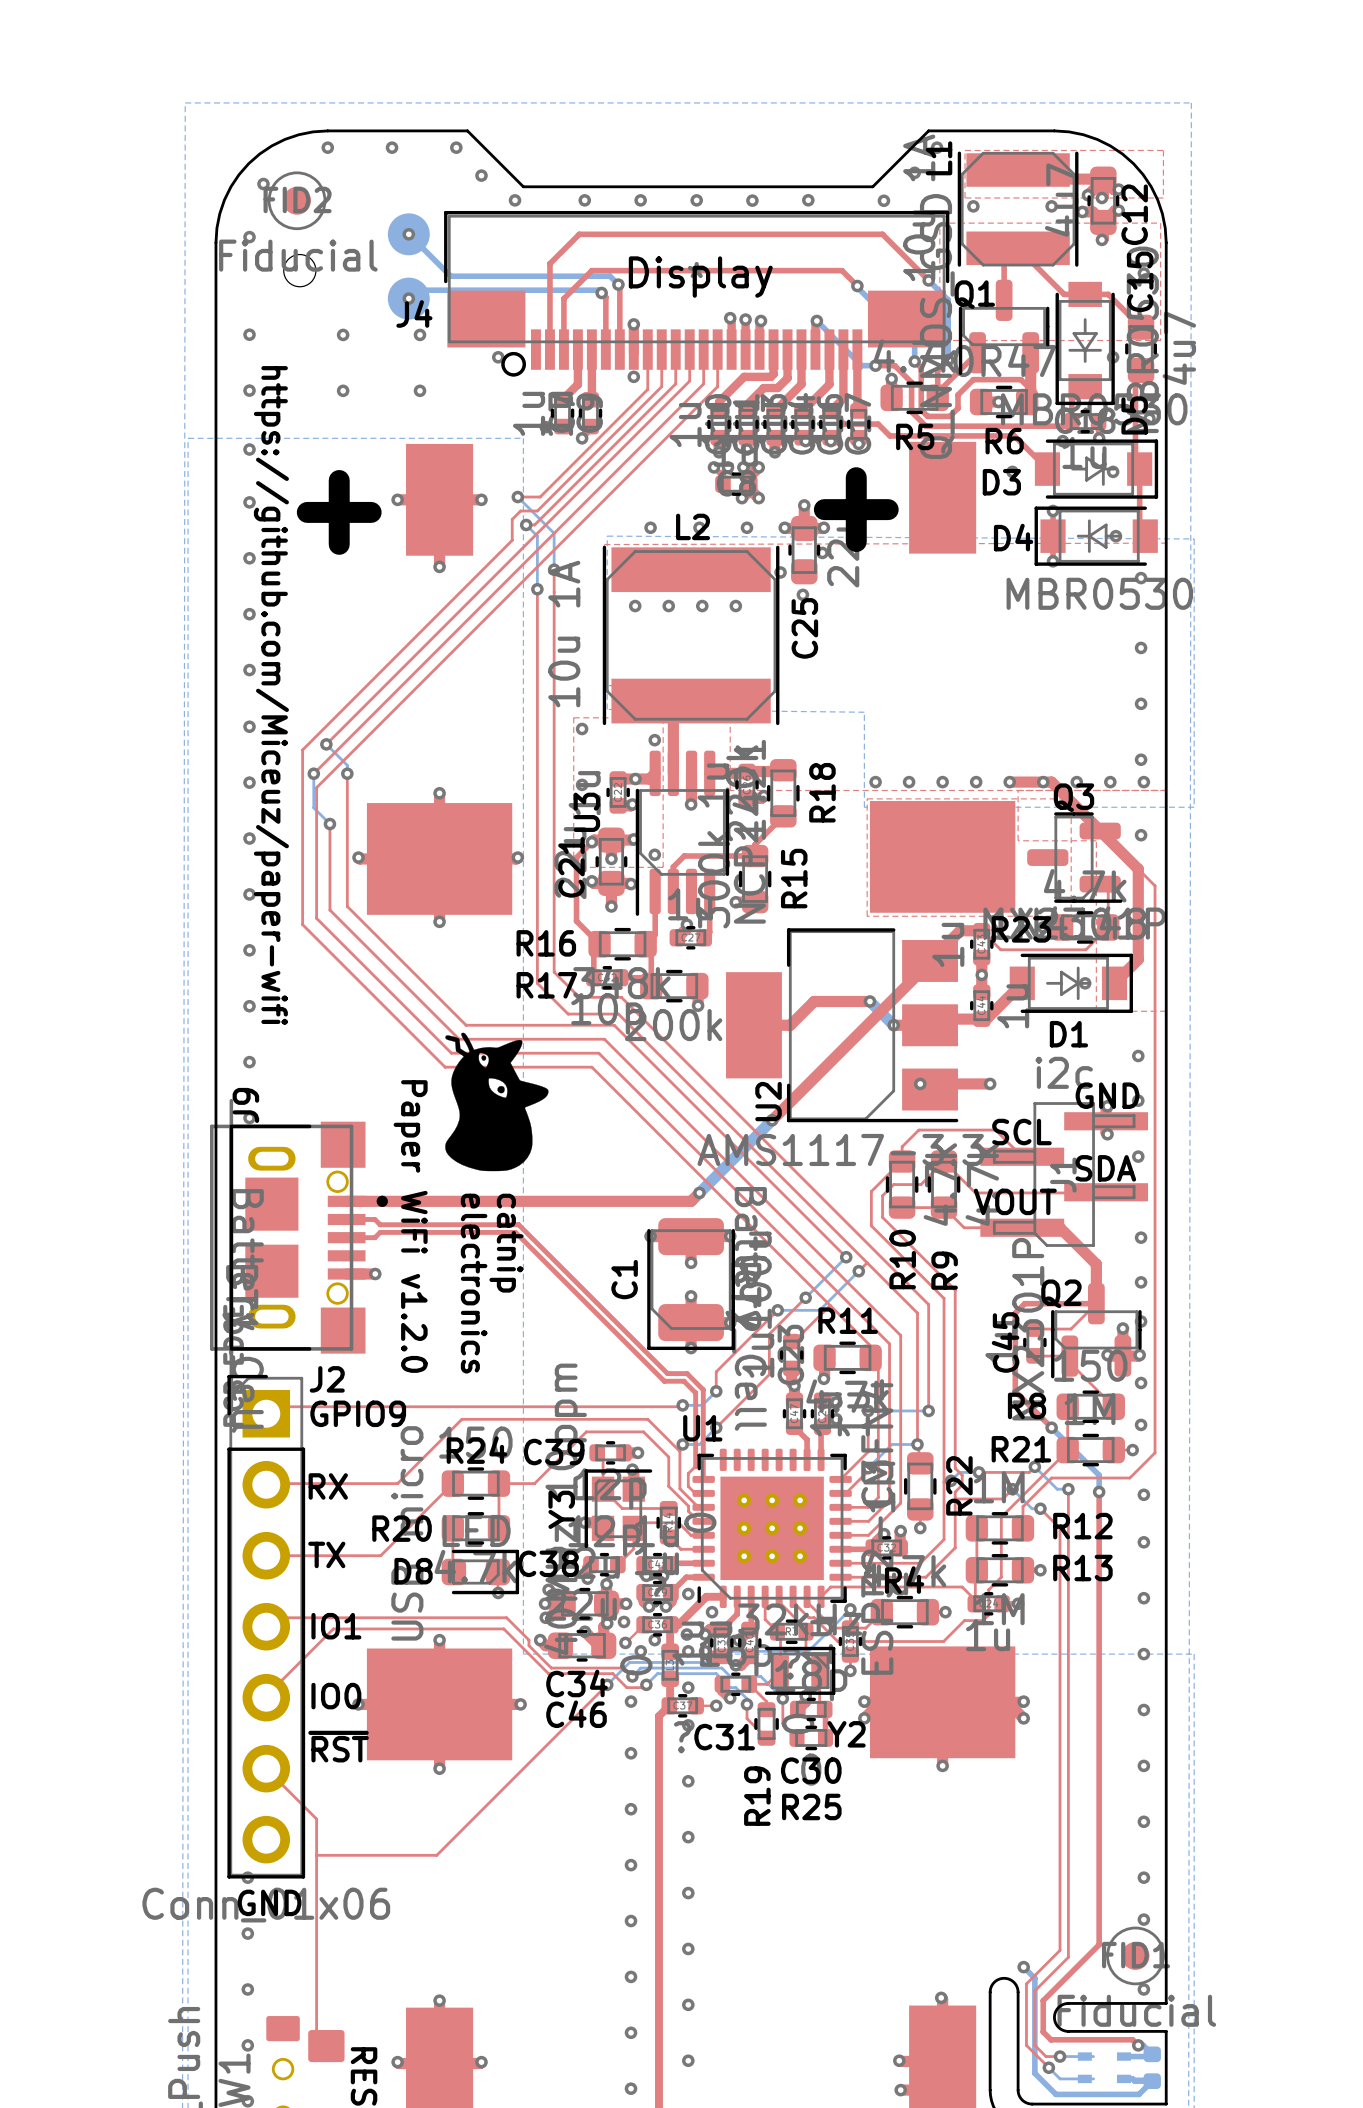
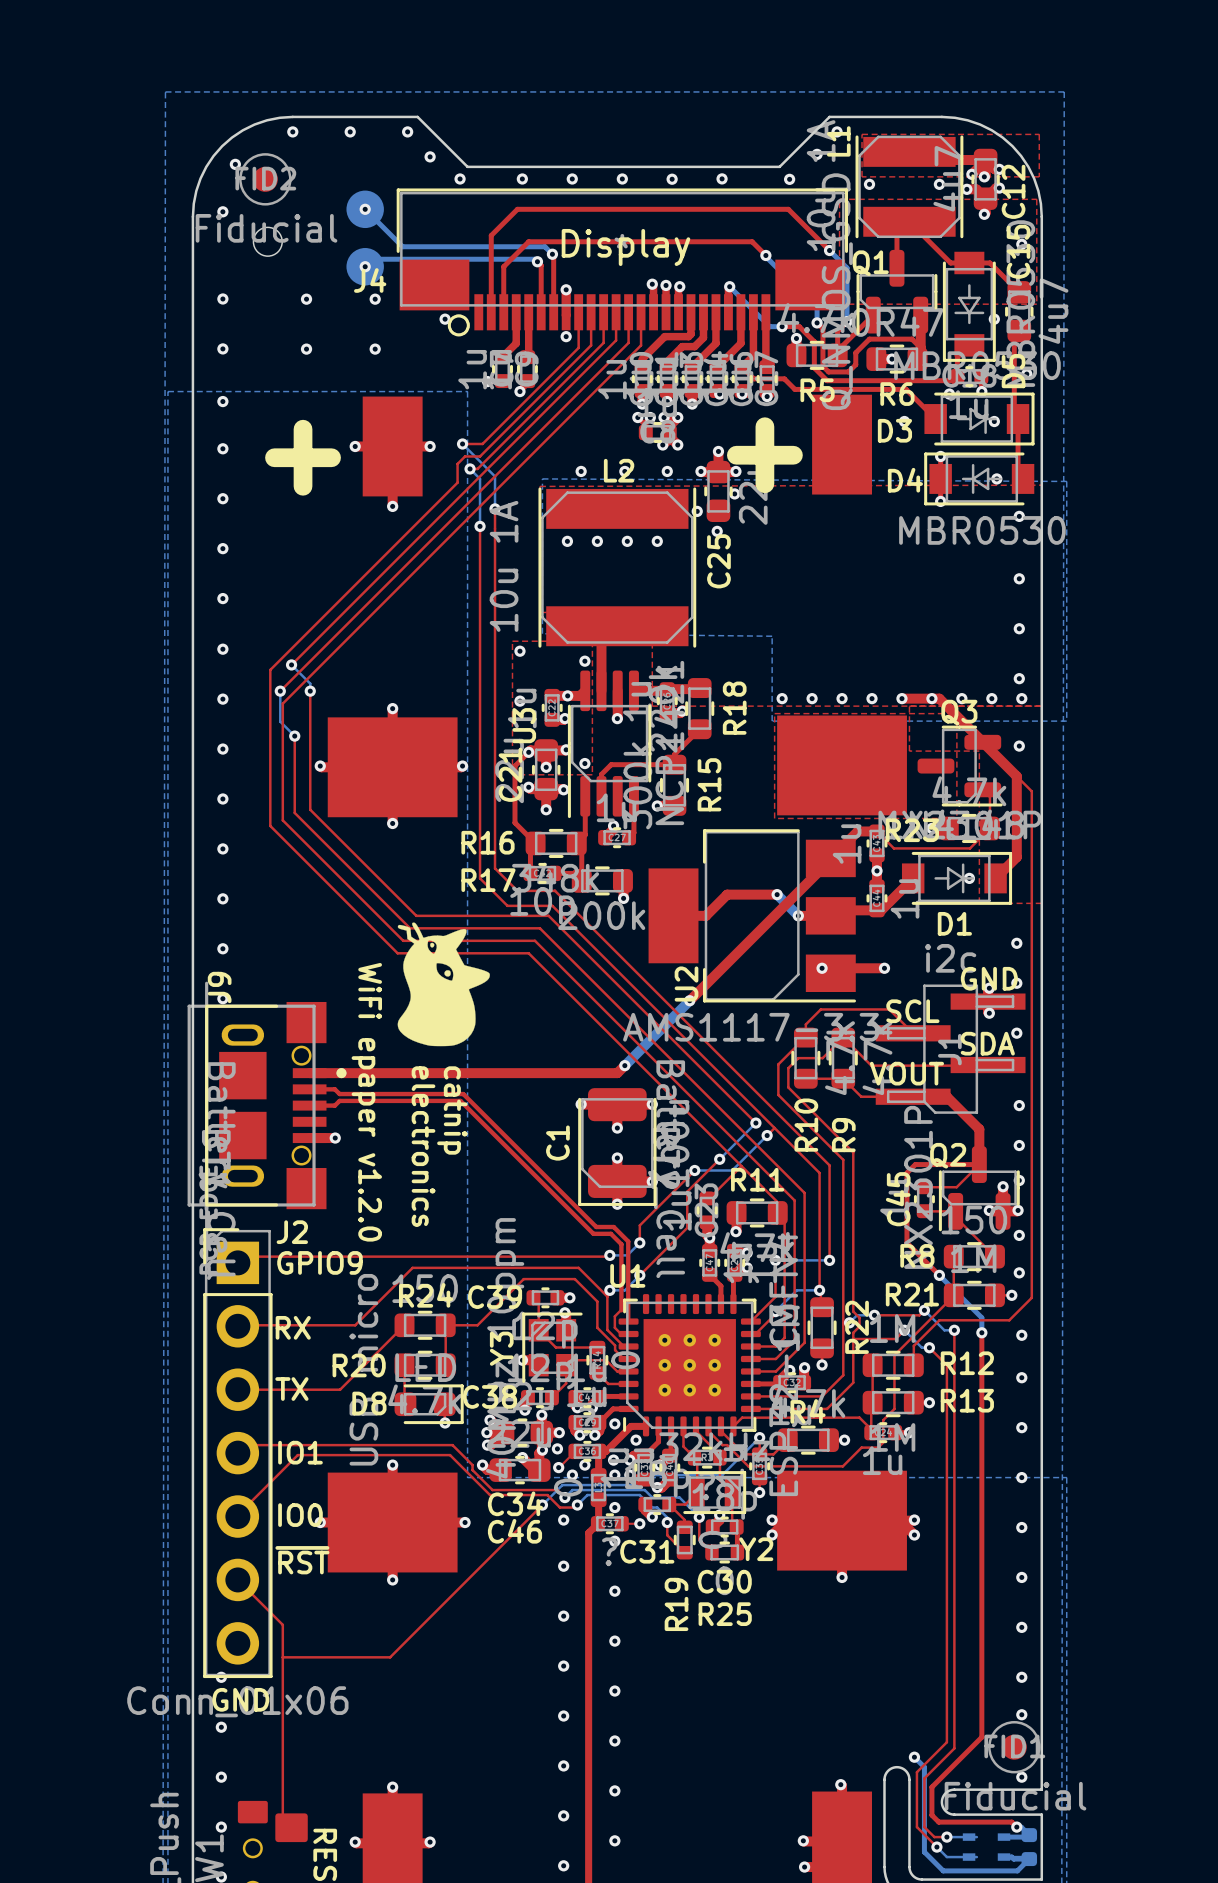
text: https://github.com/Miceuz/paper-wifi (271, 695) -> none
text: Paper WiFi v1.2.0 (410, 1226) -> WiFi epaper v1.2.0 (366, 1102)

